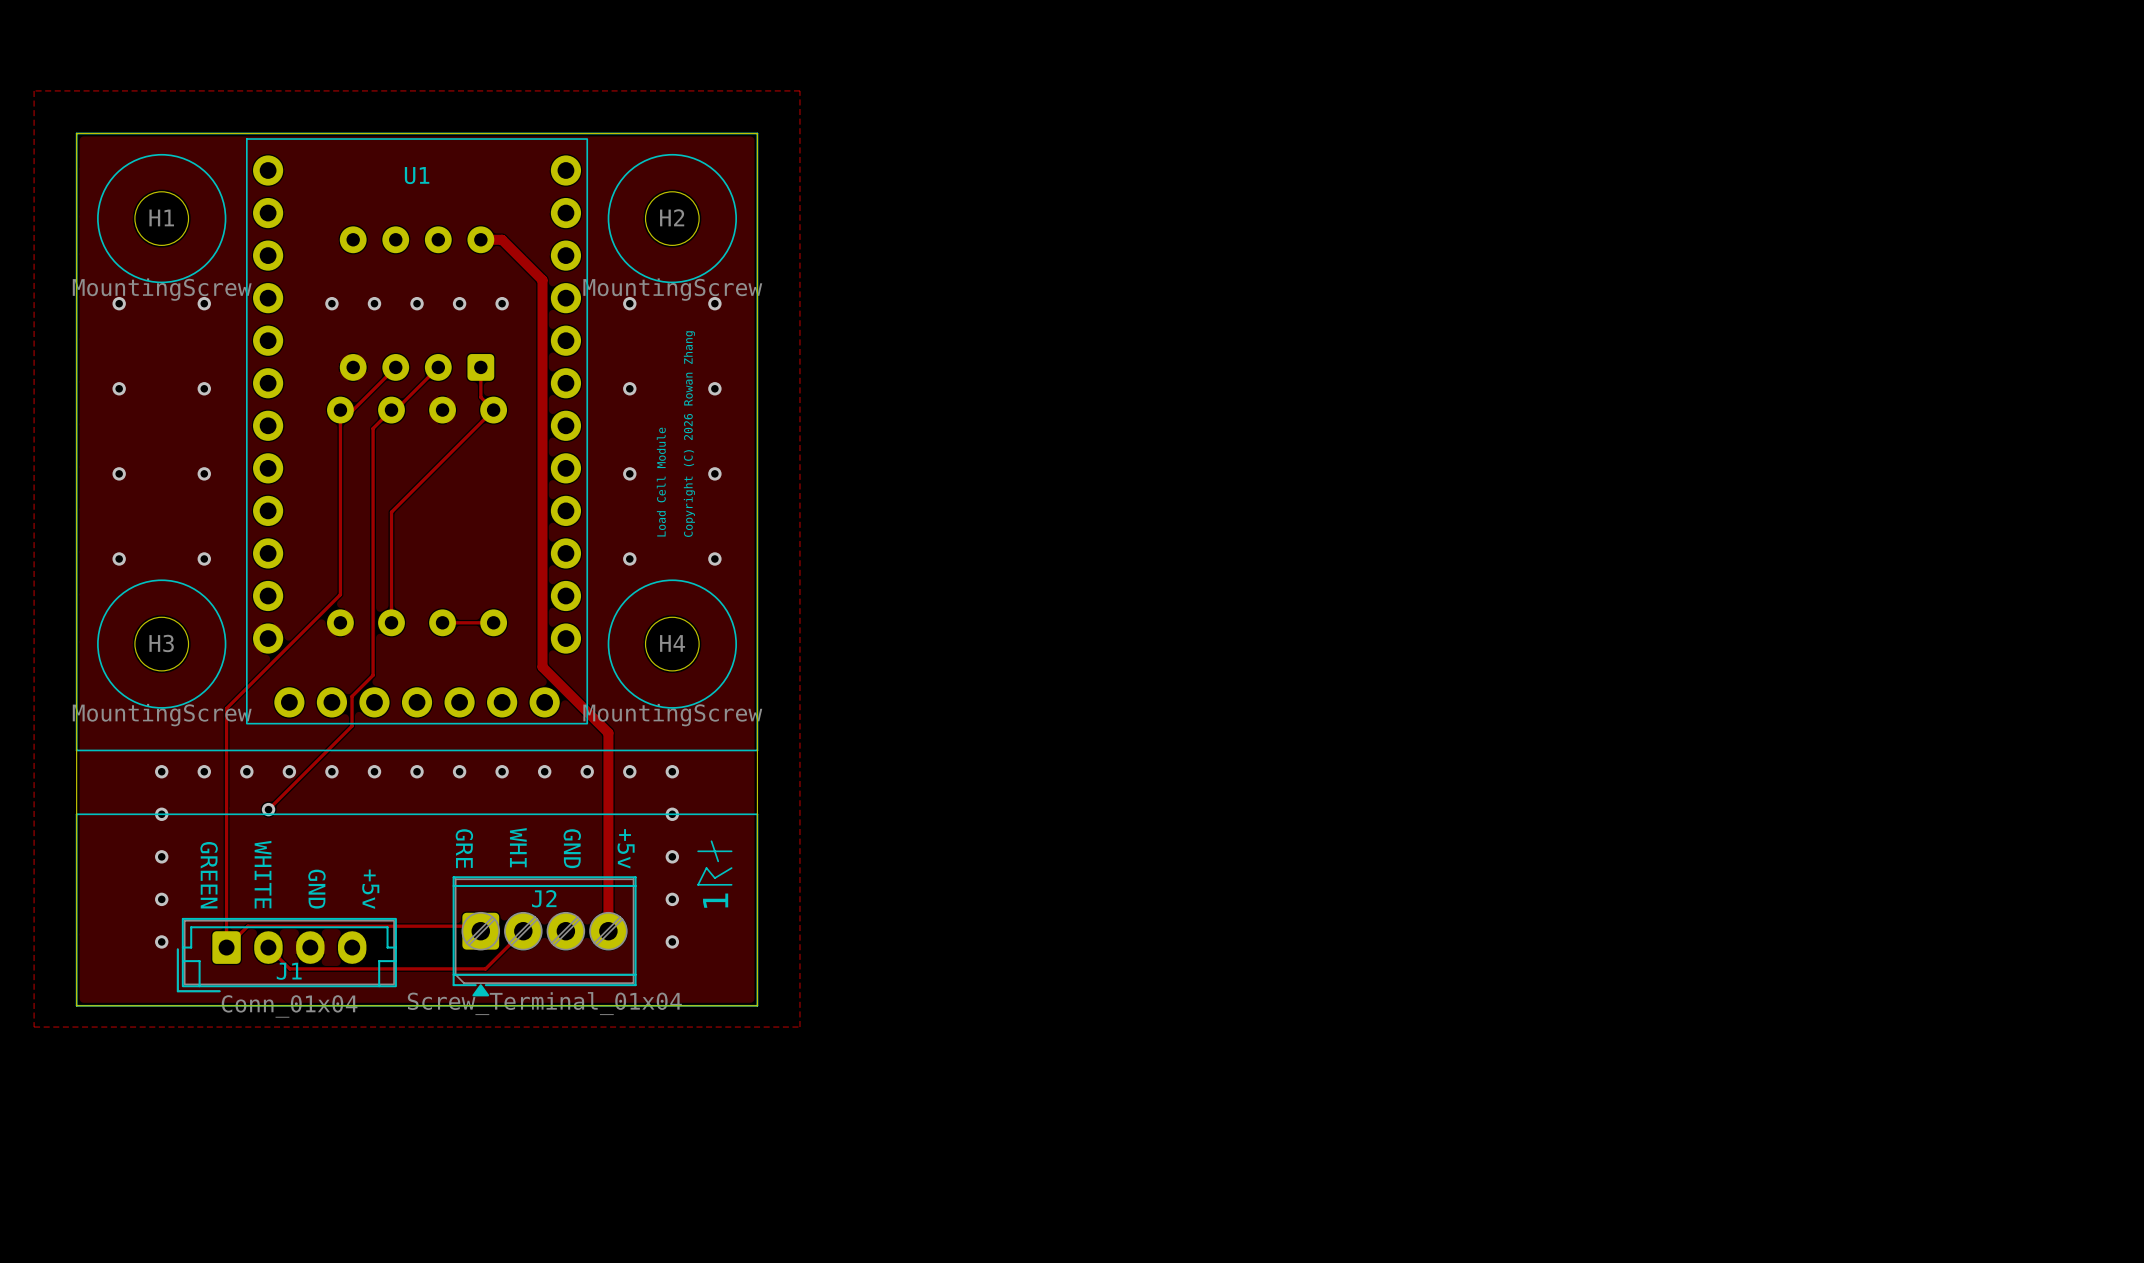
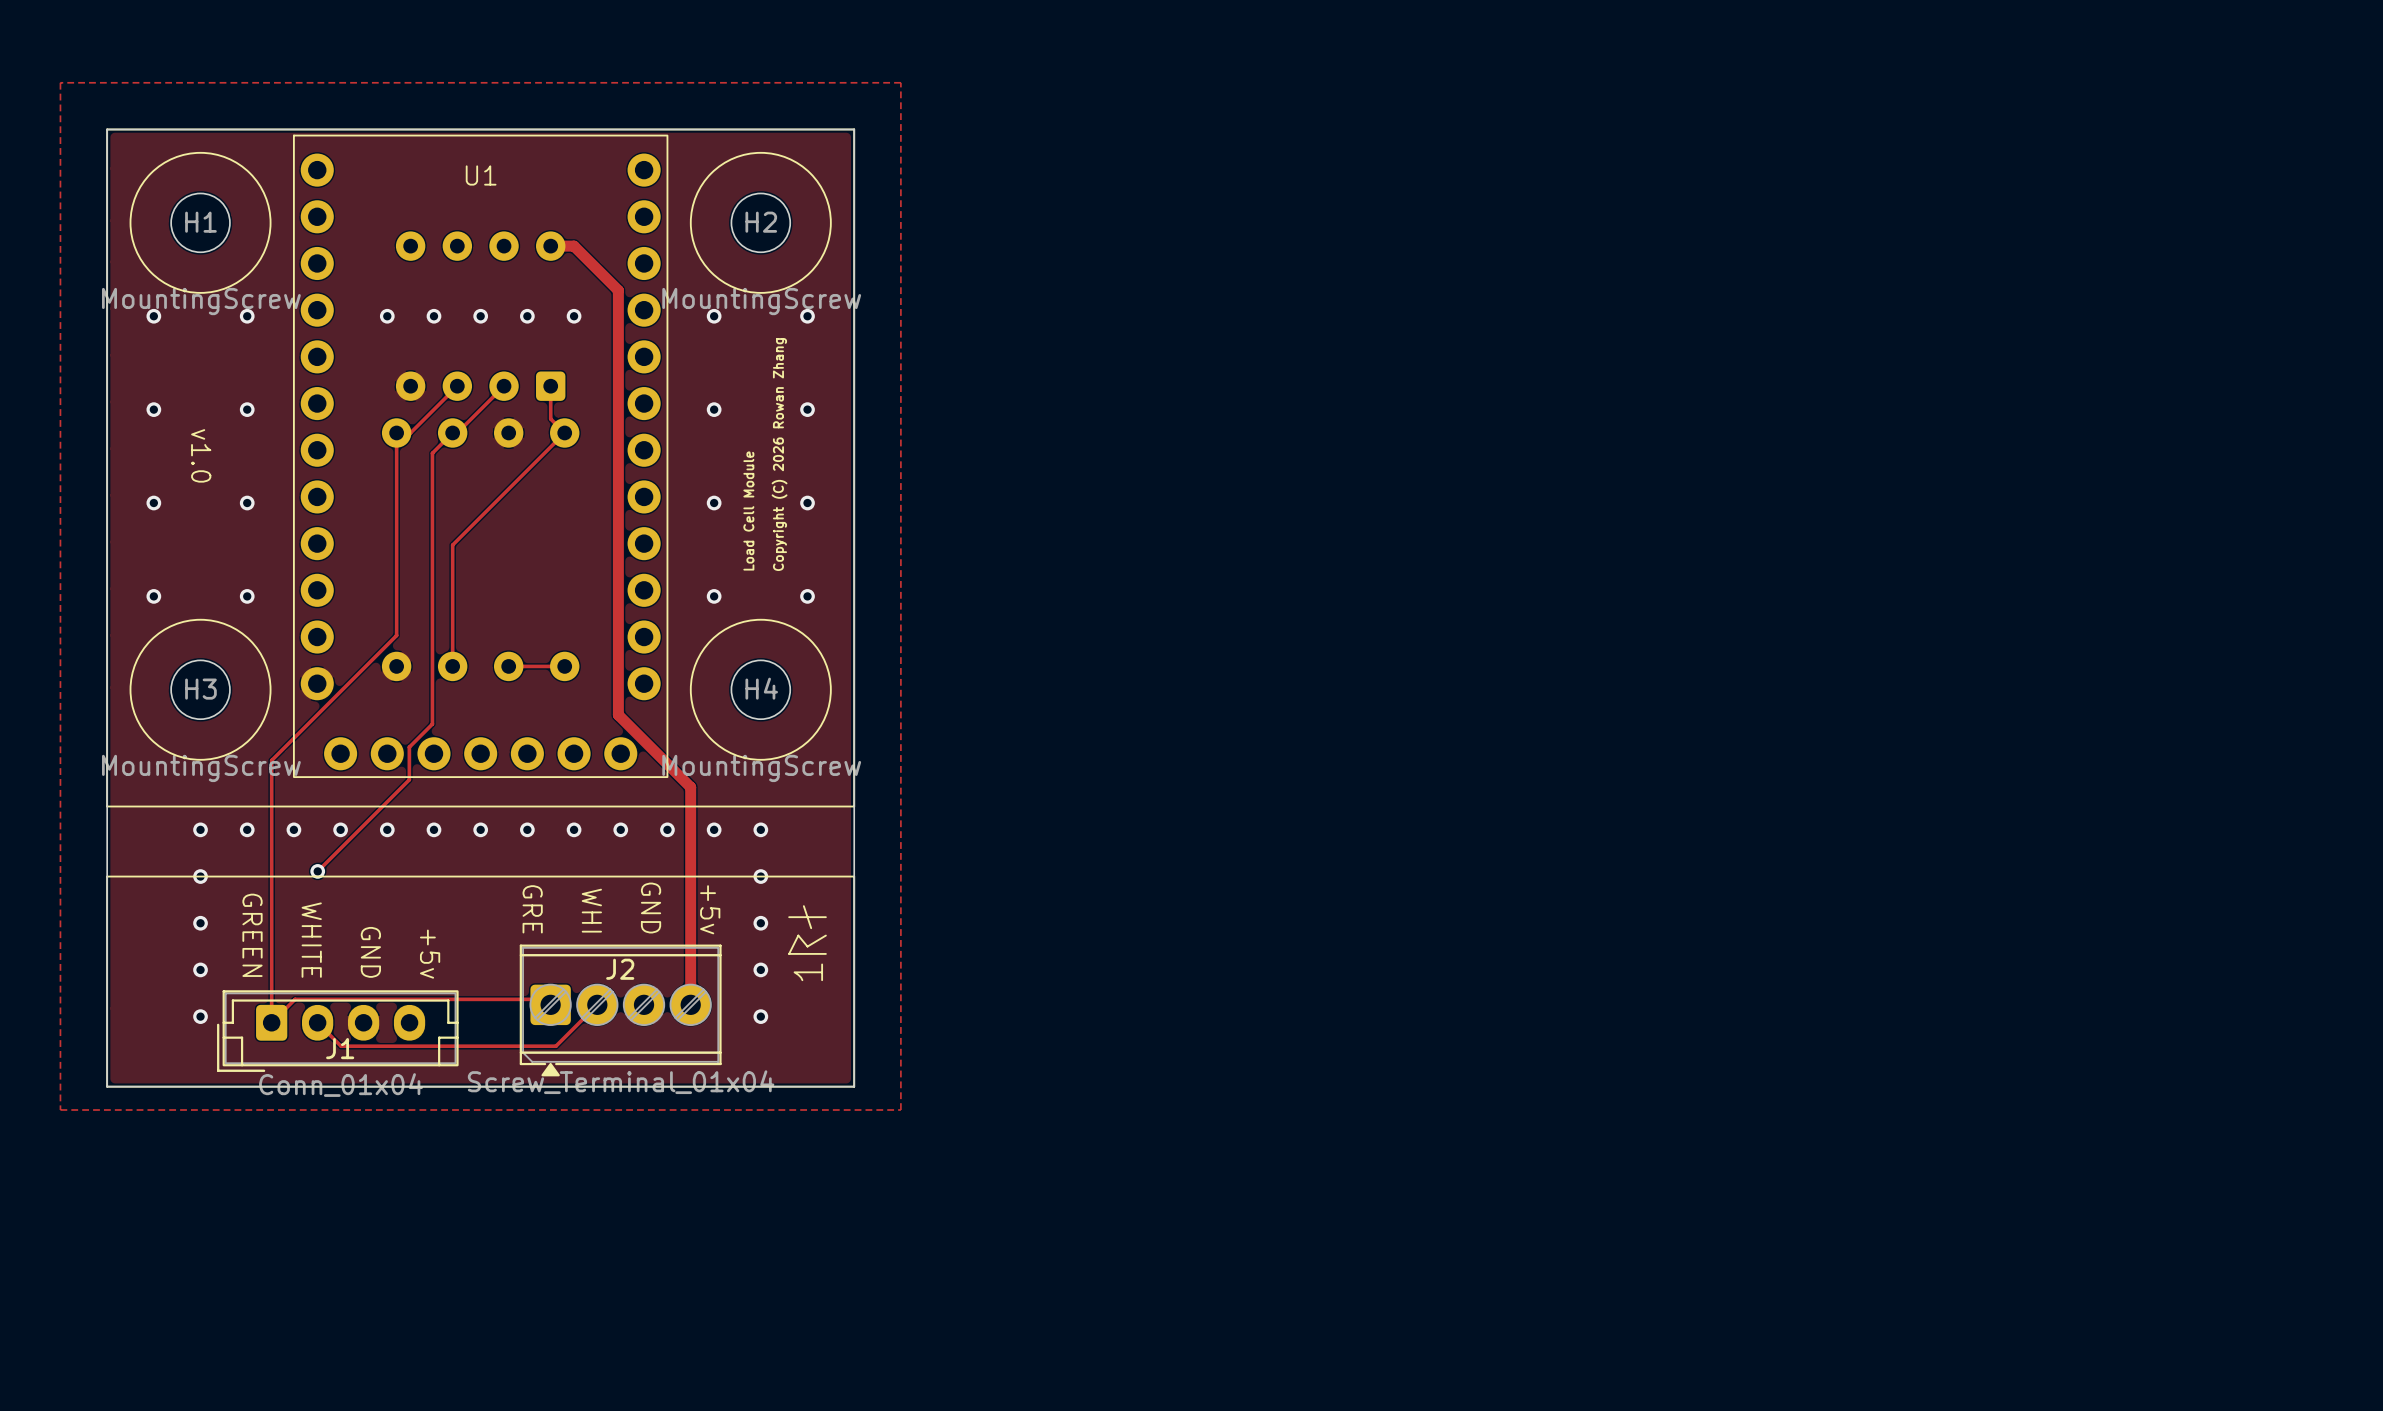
text: none -> v1.0 (201, 455)

